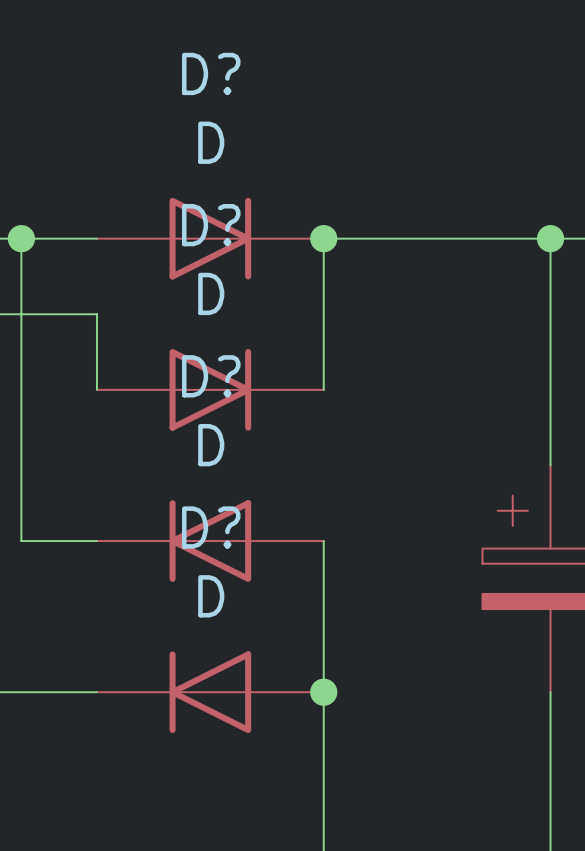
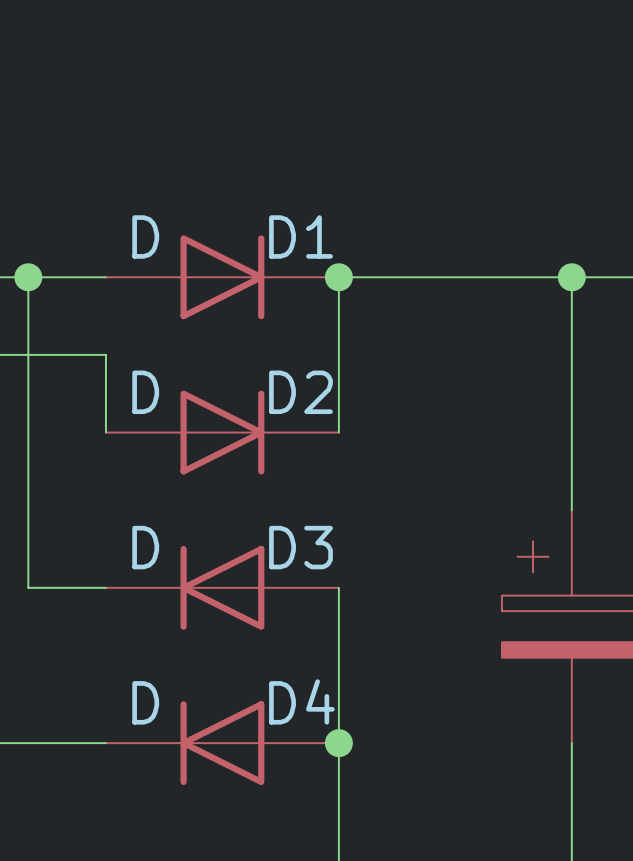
D? name: D? (211, 73) -> D1 (301, 236)
D? value position: D (211, 142) -> D (145, 236)
D? name: D? (211, 225) -> D2 (301, 392)
D? value position: D (211, 293) -> D (145, 392)
D? name: D? (211, 376) -> D3 (301, 547)
D? value position: D (211, 445) -> D (145, 547)
D? name: D? (211, 527) -> D4 (301, 701)
D? value position: D (211, 596) -> D (145, 702)

